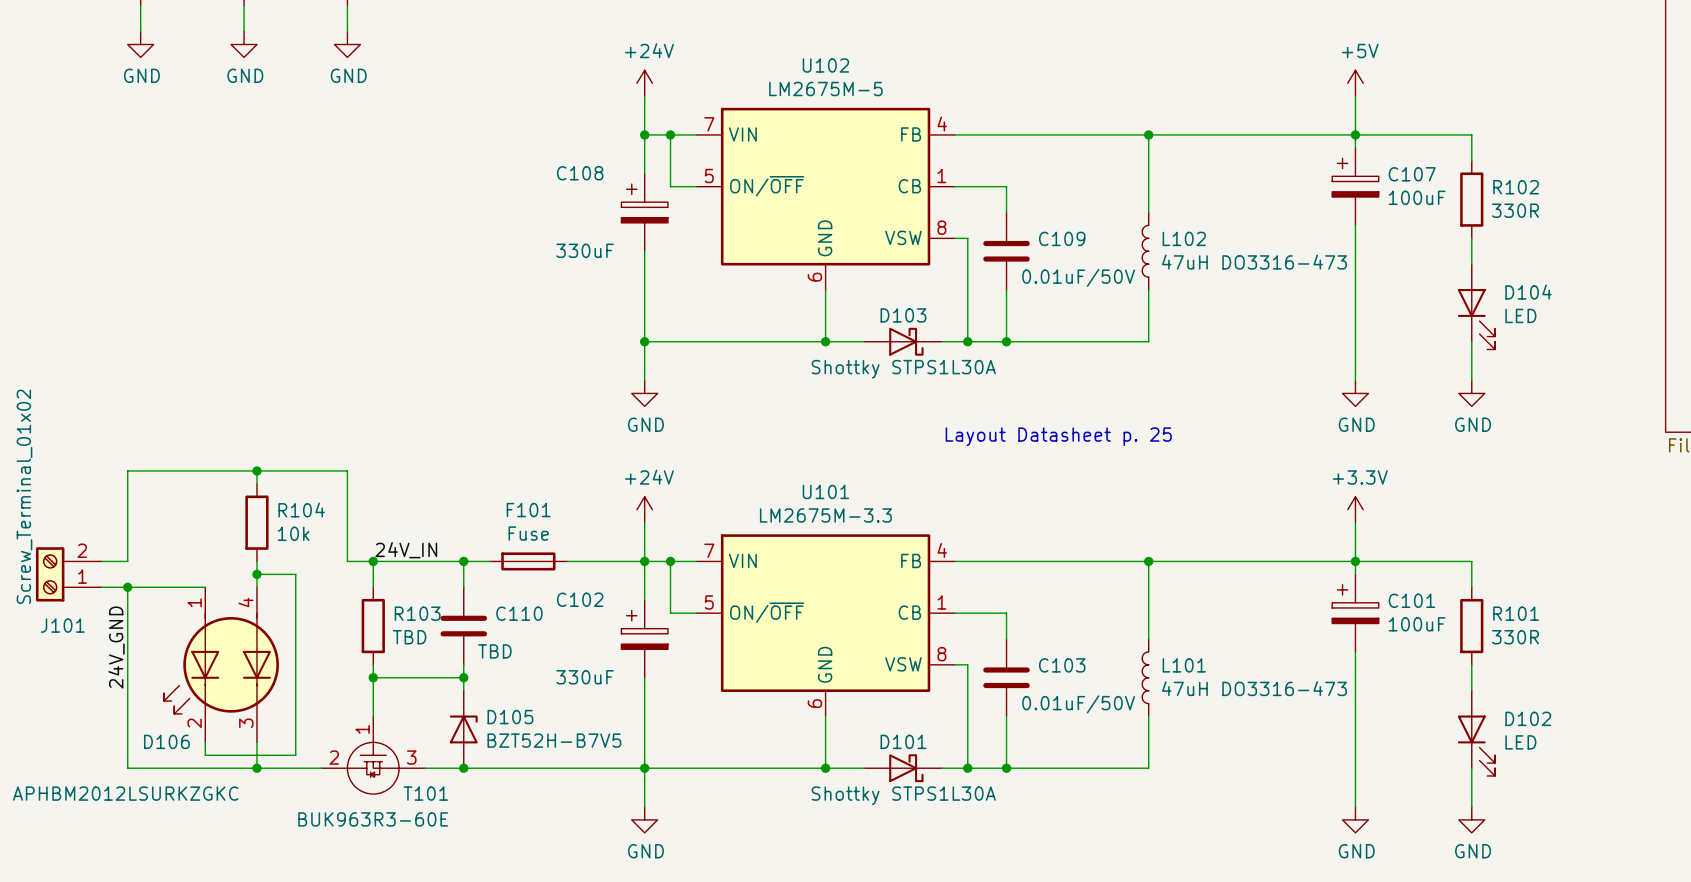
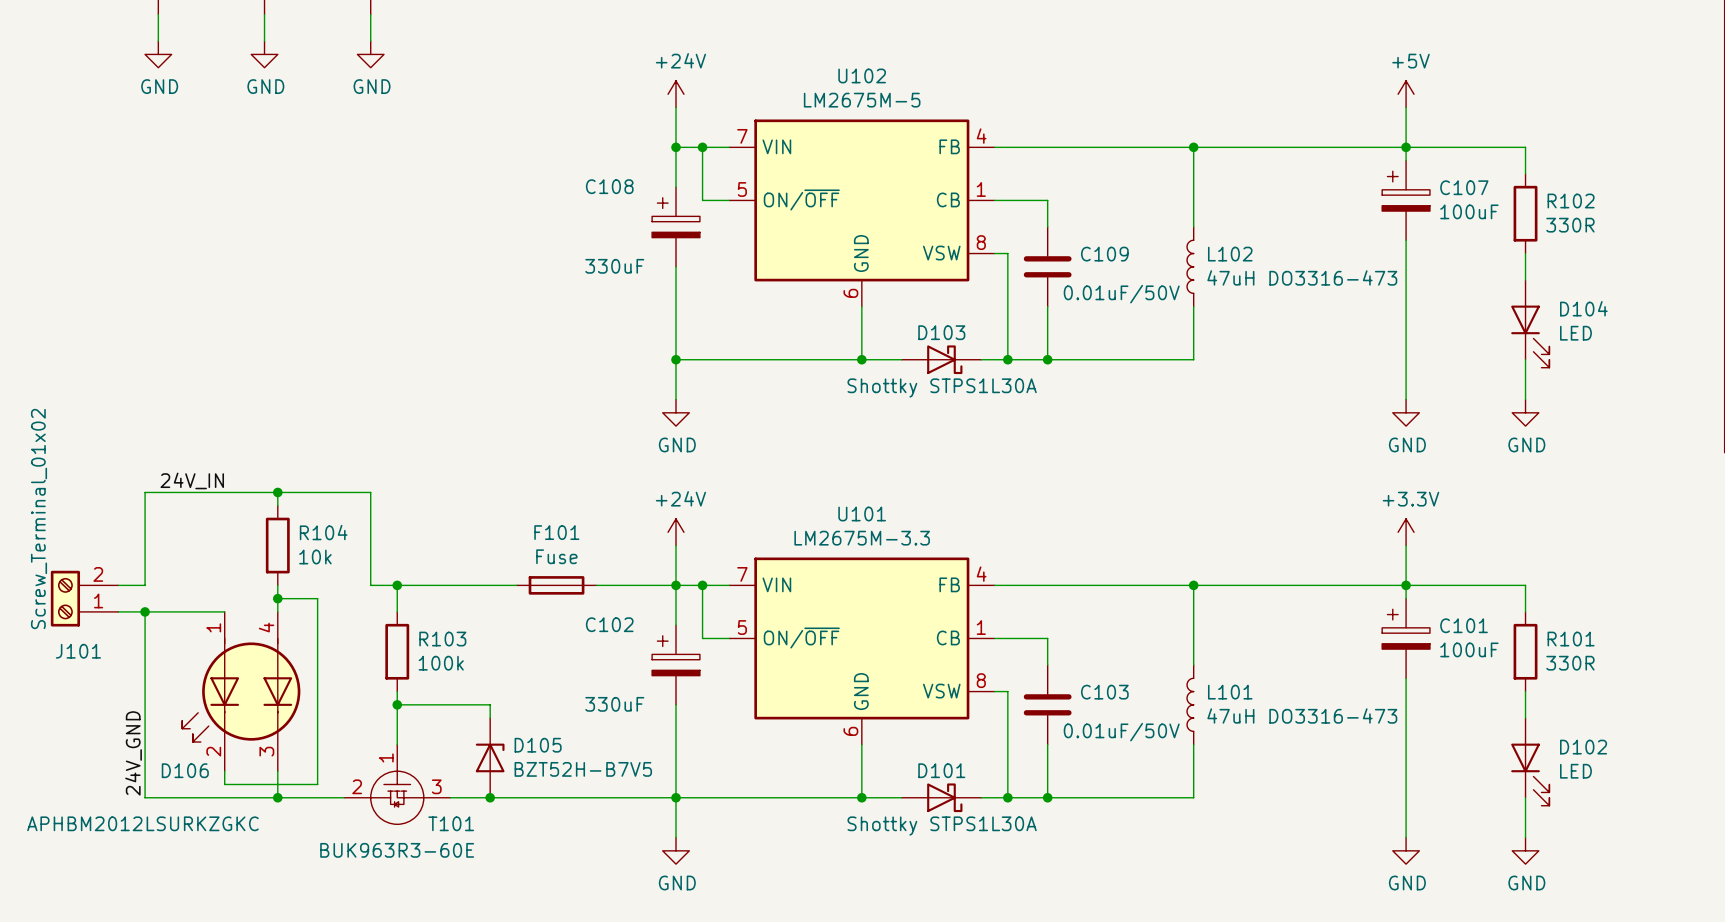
text: Layout Datasheet p. 25 (1058, 436) -> none
label position: 24V_IN (406, 550) -> 24V_IN (192, 480)
wire: (463, 561) (463, 587) -> none
junction: (463, 561) -> none
C110: TBD (463, 626) -> none
R103 value: TBD (409, 637) -> 100k (441, 663)
label position: 24V_GND (116, 647) -> 24V_GND (133, 753)
wire: (463, 664) (463, 677) -> none
junction: (463, 677) -> none

